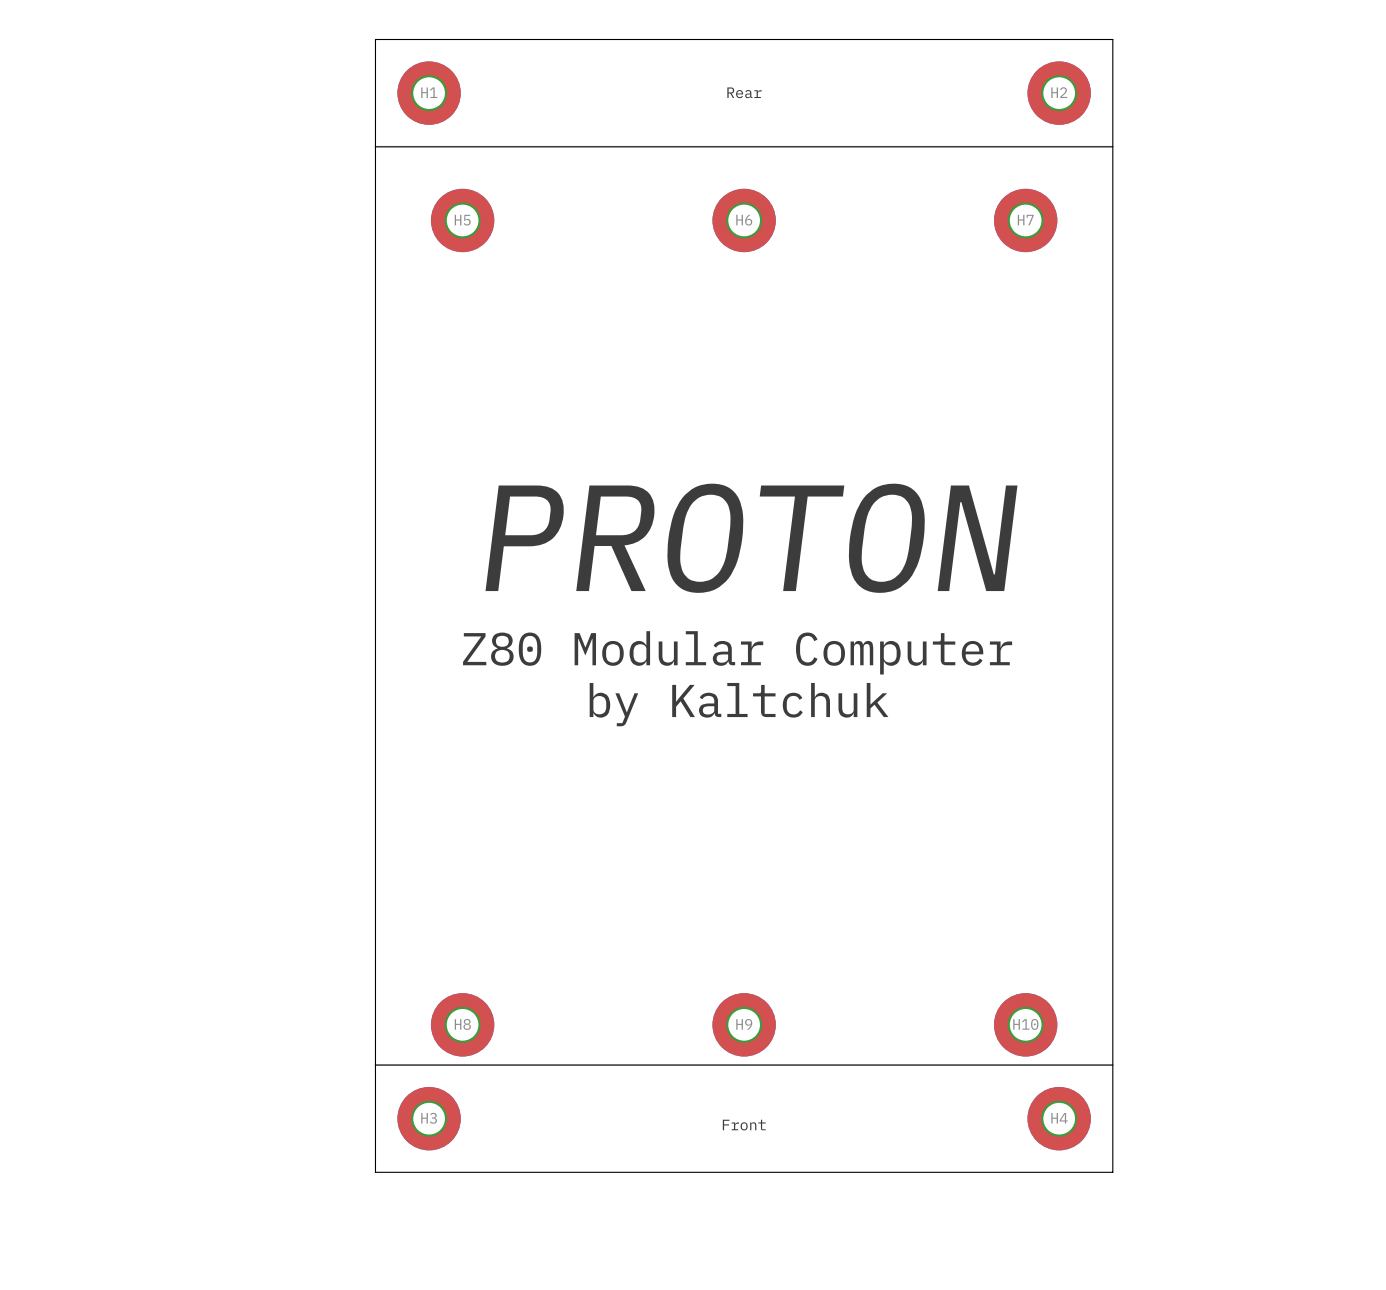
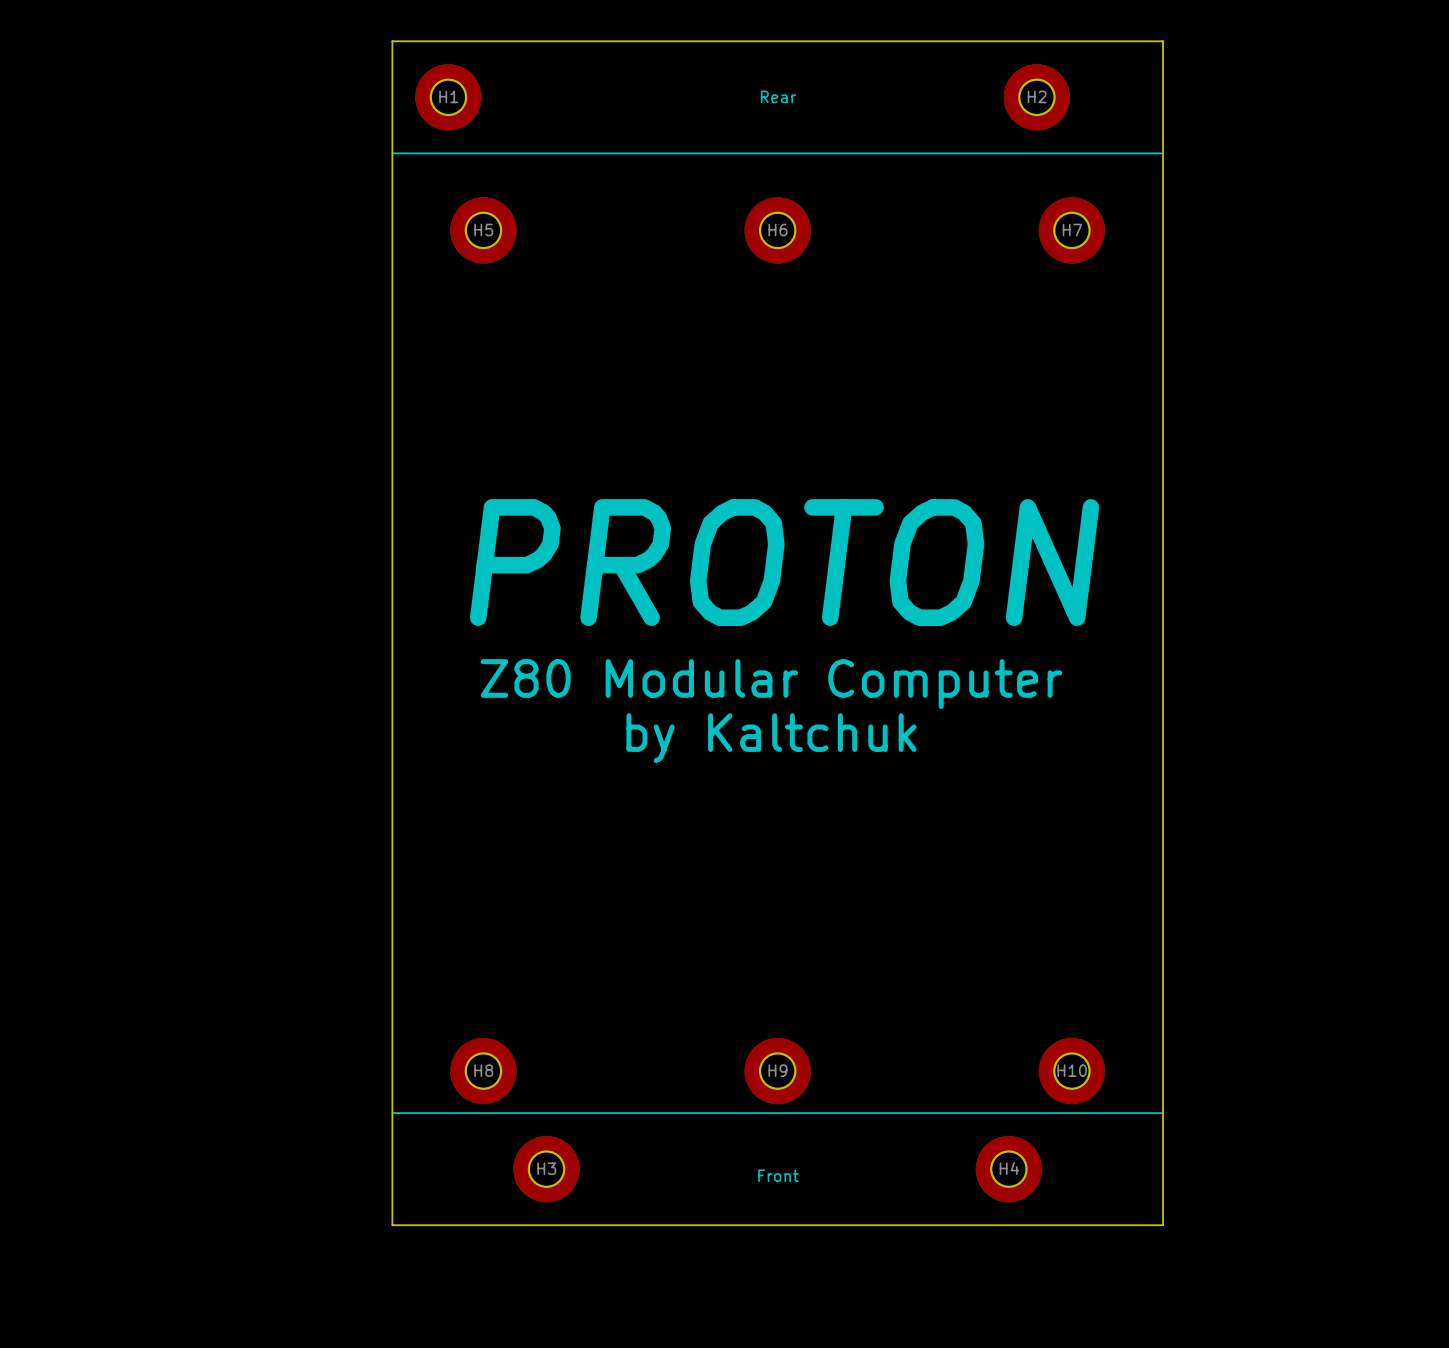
H2 position: (1059, 93) -> (1036, 97)
H3 position: (429, 1118) -> (546, 1169)
H4 position: (1059, 1118) -> (1008, 1169)

